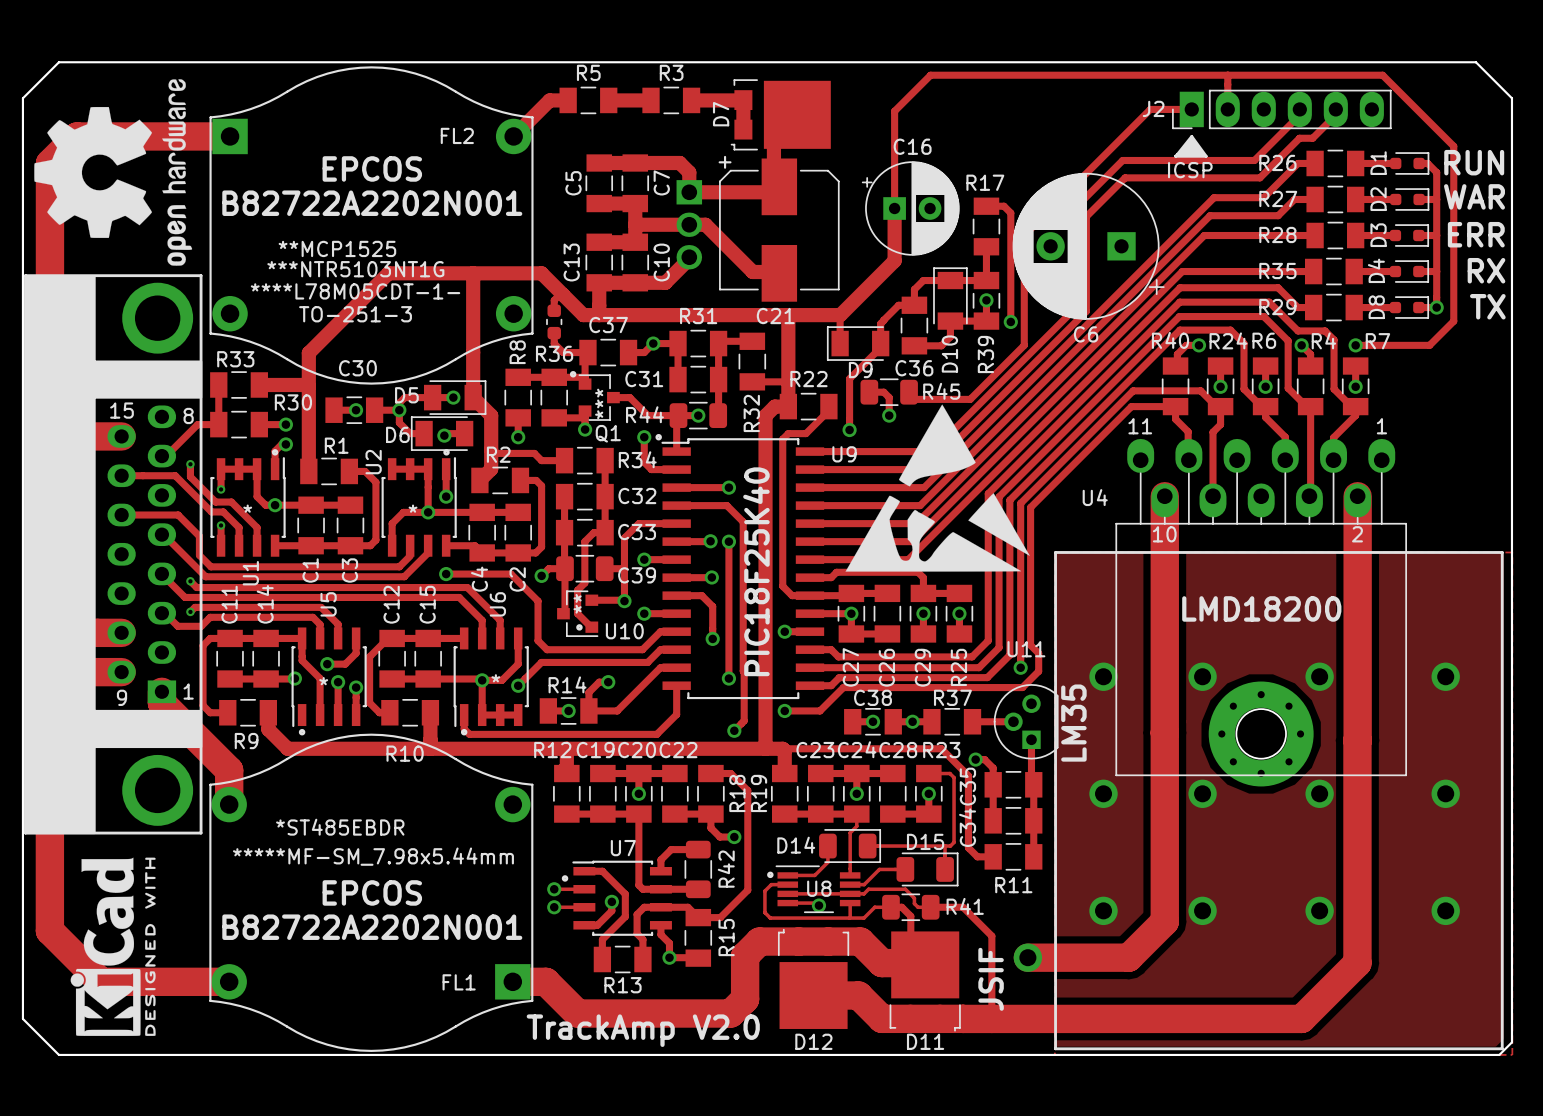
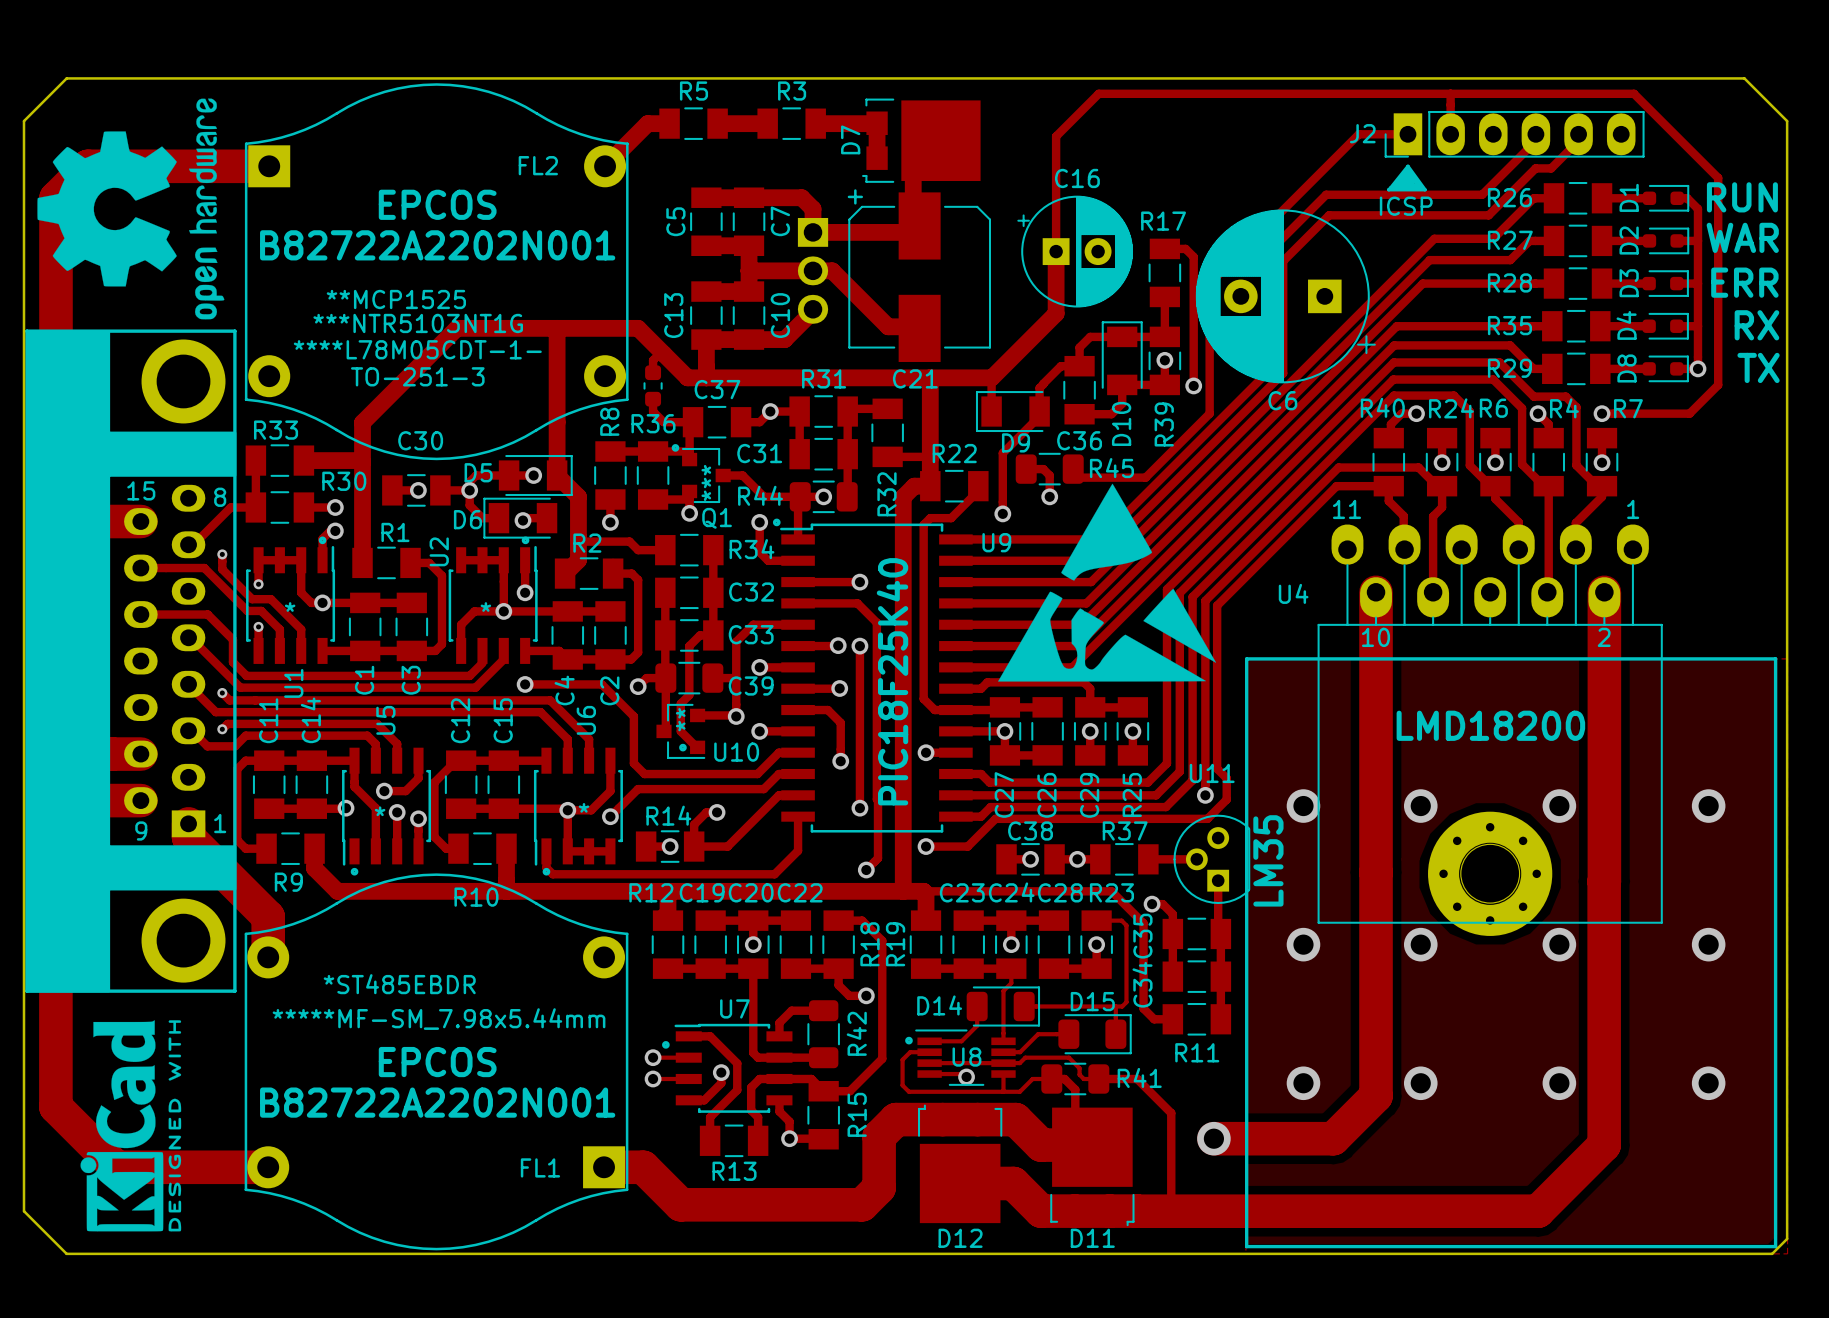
text: JSIF (991, 979) -> none
text: TrackAmp V2.0 (643, 1030) -> none

